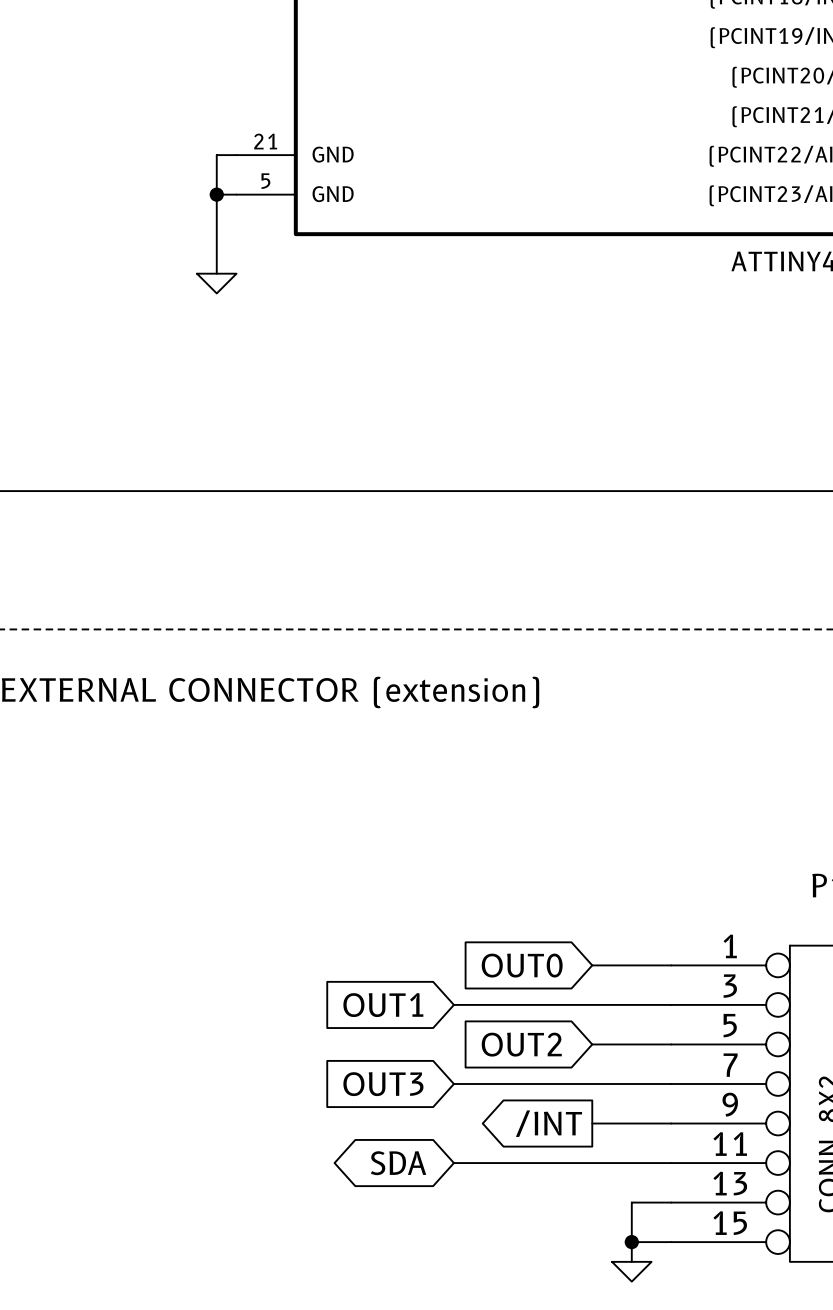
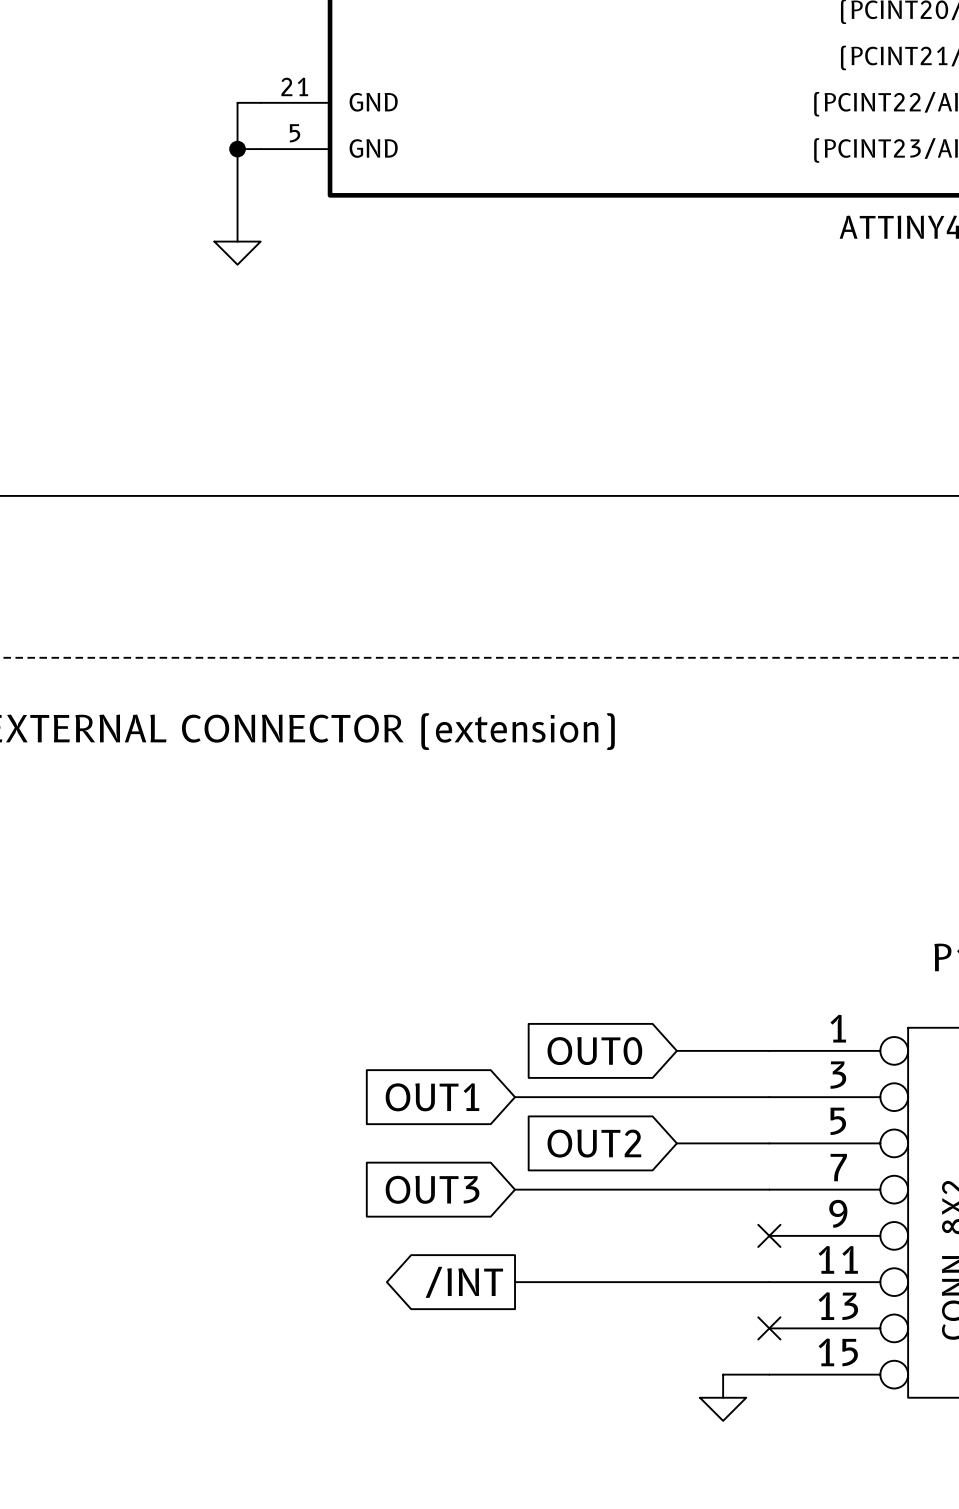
global label: /INT (548, 1123) -> none
wire: (592, 1123) (671, 1123) -> none
no-connect mark: none -> (769, 1235)
global label shape: bidirectional (398, 1163) -> output (464, 1282)
global label: SDA (398, 1163) -> /INT (464, 1282)
wire: (671, 1202) (631, 1202) (631, 1242) -> none
no-connect mark: none -> (769, 1328)
junction: (631, 1242) -> none

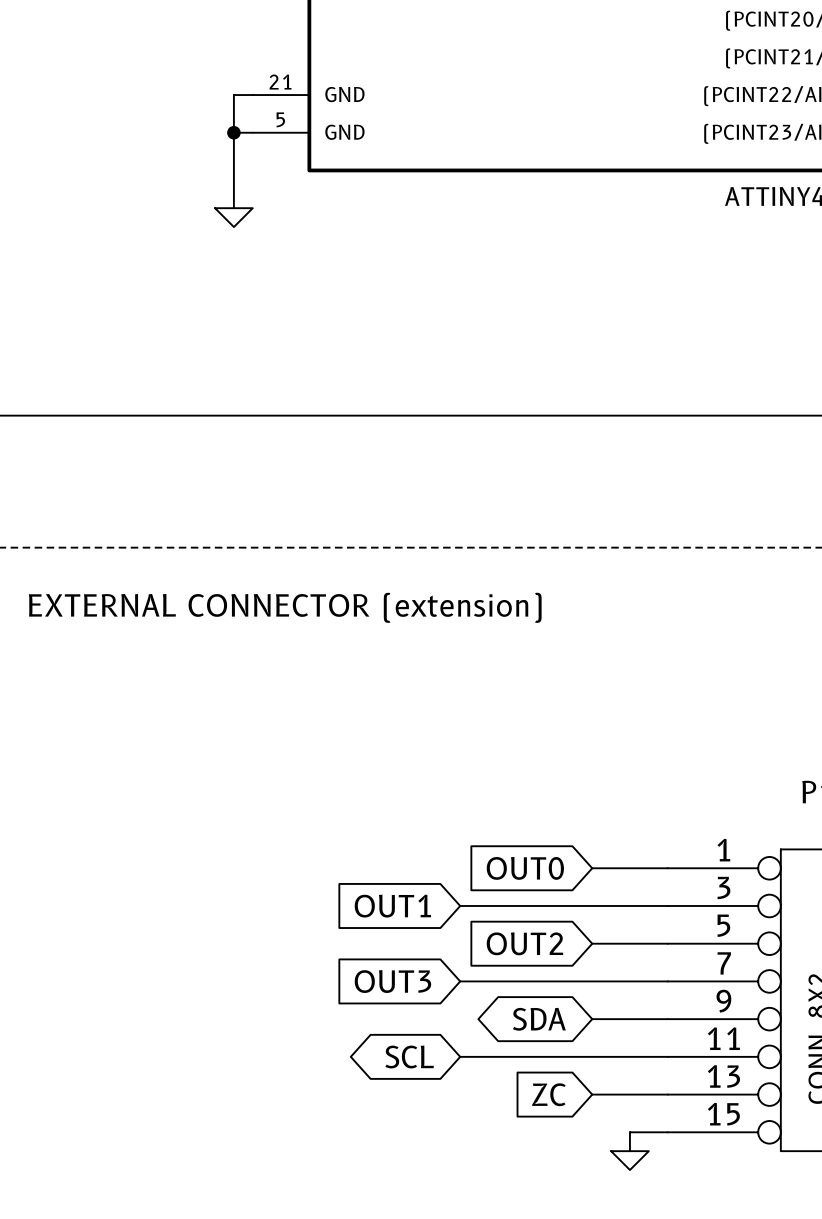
wire: none -> (592, 1019) (667, 1019)
no-connect mark: (769, 1235) -> none
global label: none -> SDA (539, 1019)
global label shape: output (464, 1282) -> bidirectional (409, 1056)
global label: /INT (464, 1282) -> SCL (409, 1056)
global label: none -> ZC (548, 1094)
wire: none -> (592, 1094) (667, 1094)
no-connect mark: (769, 1328) -> none

